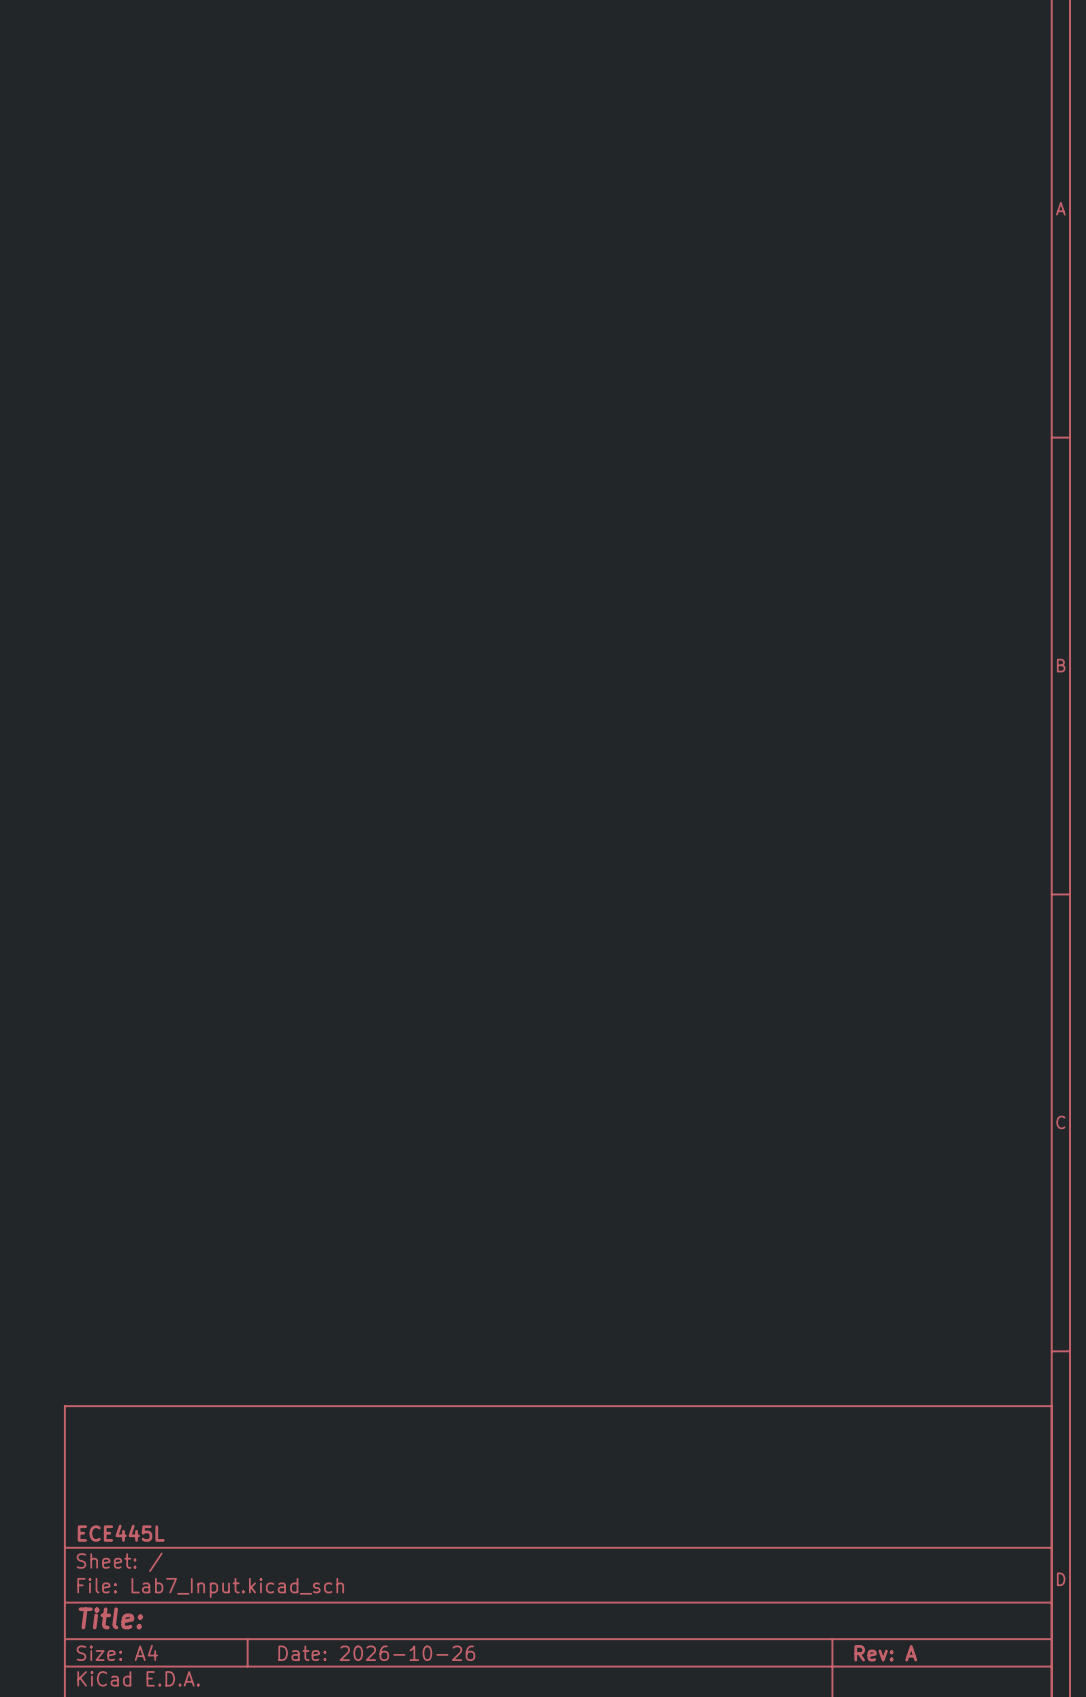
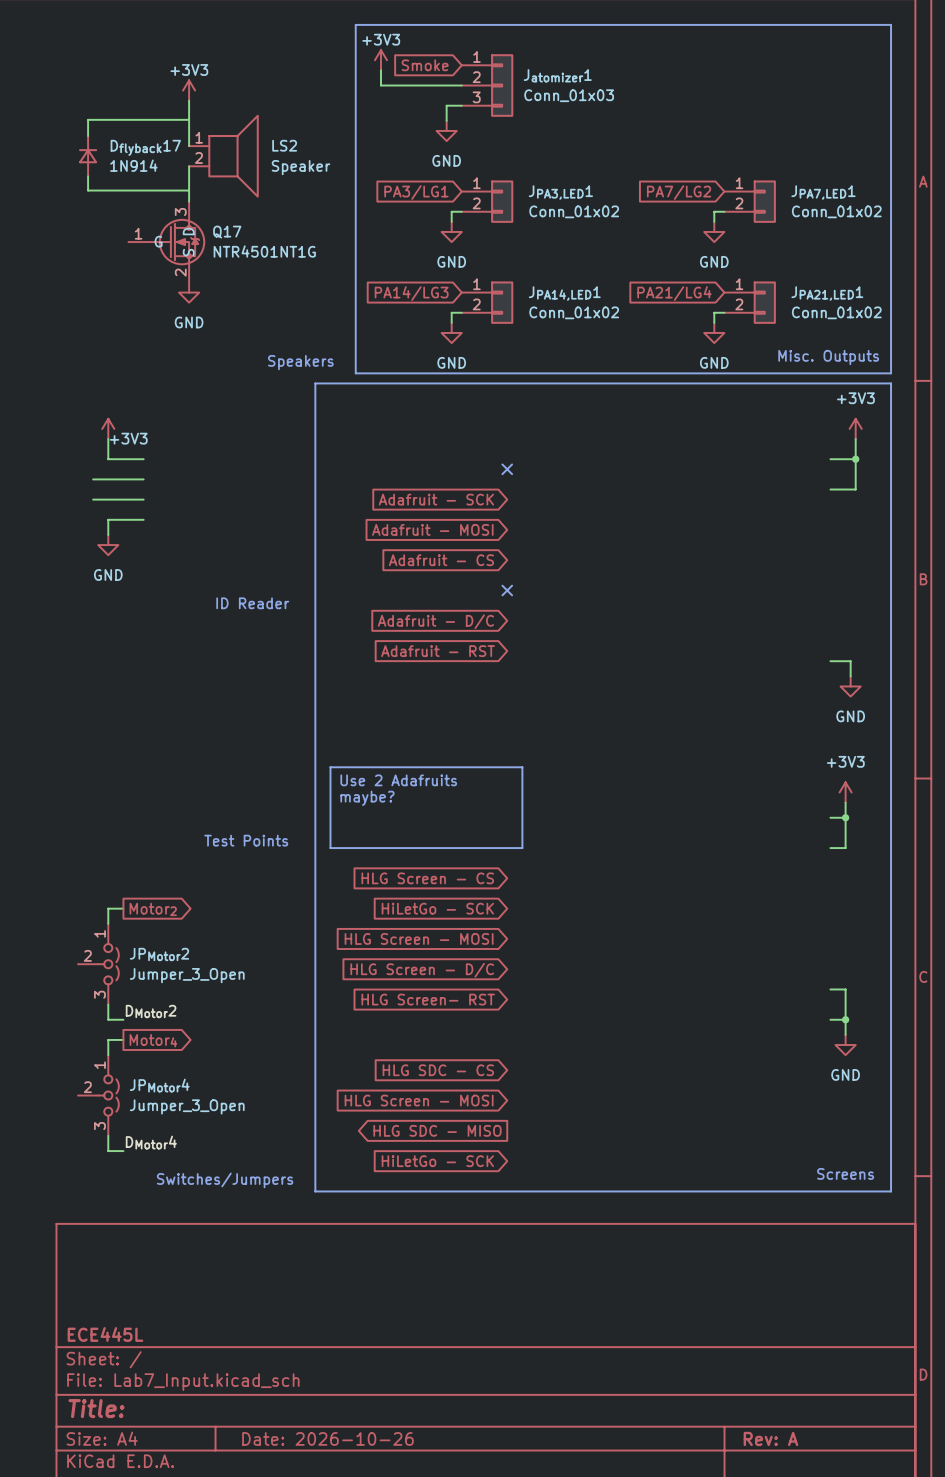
line: none -> (355, 24) (891, 24) (891, 373) (355, 373) (355, 24)
power symbol: none -> +3V3 (380, 60)
global label: none -> Smoke (425, 65)
wire: none -> (380, 70) (380, 85) (461, 85)
Jatomizer1: none -> Conn_01x03 (487, 85)
power symbol: none -> +3V3 (189, 90)
wire: none -> (189, 100) (189, 146)
wire: none -> (461, 105) (446, 105) (446, 120)
wire: none -> (189, 119) (88, 119) (88, 136)
power symbol: none -> GND (446, 130)
Dflyback17: none -> 1N914 (88, 156)
LS2: none -> Speaker (223, 156)
wire: none -> (189, 166) (189, 201)
wire: none -> (88, 176) (88, 190) (189, 190)
global label: none -> PA3/LG1 (416, 192)
global label: none -> PA7/LG2 (679, 192)
JPA3,LED1: none -> Conn_01x02 (487, 201)
JPA7,LED1: none -> Conn_01x02 (750, 201)
wire: none -> (461, 211) (451, 211) (451, 221)
wire: none -> (724, 211) (714, 211) (714, 221)
power symbol: none -> GND (451, 231)
power symbol: none -> GND (714, 231)
Q17: none -> NTR4501NT1G (166, 242)
power symbol: none -> GND (189, 292)
global label: none -> PA14/LG3 (411, 293)
global label: none -> PA21/LG4 (674, 293)
JPA14,LED1: none -> Conn_01x02 (487, 302)
JPA21,LED1: none -> Conn_01x02 (750, 302)
wire: none -> (461, 312) (451, 312) (451, 322)
wire: none -> (724, 312) (714, 312) (714, 322)
power symbol: none -> GND (451, 332)
power symbol: none -> GND (714, 332)
text: none -> Misc. Outputs (828, 357)
text: none -> Speakers (300, 362)
line: none -> (315, 383) (891, 383) (891, 1191) (315, 1191) (315, 383)
power symbol: none -> +3V3 (108, 428)
power symbol: none -> +3V3 (855, 428)
wire: none -> (108, 439) (108, 459) (143, 459)
wire: none -> (855, 439) (855, 489) (830, 489)
wire: none -> (830, 459) (855, 459)
junction: none -> (855, 459)
no-connect mark: none -> (507, 469)
wire: none -> (93, 479) (143, 479)
wire: none -> (93, 499) (143, 499)
global label: none -> Adafruit - SCK (436, 499)
wire: none -> (143, 519) (108, 519) (108, 534)
global label: none -> Adafruit - MOSI (432, 529)
power symbol: none -> GND (108, 545)
global label: none -> Adafruit - CS (441, 560)
no-connect mark: none -> (507, 590)
text: none -> ID Reader (252, 603)
global label: none -> Adafruit - D/C (435, 621)
global label: none -> Adafruit - RST (438, 651)
wire: none -> (830, 661) (850, 661) (850, 676)
power symbol: none -> GND (850, 686)
line: none -> (330, 767) (522, 767) (522, 848) (330, 848) (330, 767)
text: none -> Use 2 Adafruits (398, 780)
power symbol: none -> +3V3 (845, 792)
text: none -> maybe? (367, 798)
wire: none -> (845, 802) (845, 848) (830, 848)
wire: none -> (830, 817) (845, 817)
junction: none -> (845, 817)
text: none -> Test Points (246, 840)
global label: none -> HLG Screen - CS (427, 878)
wire: none -> (123, 908) (108, 908) (108, 923)
global label: none -> Motor2 (153, 909)
global label: none -> HiLetGo - SCK (437, 908)
global label: none -> HLG Screen - MOSI (419, 938)
JPMotor2: none -> Jumper_3_Open (98, 964)
global label: none -> HLG Screen - D/C (422, 970)
wire: none -> (830, 989) (845, 989) (845, 1034)
global label: none -> HLG Screen- RST (428, 999)
wire: none -> (108, 1004) (108, 1019) (123, 1019)
label: none -> DMotor2 (151, 1011)
wire: none -> (830, 1019) (845, 1019)
junction: none -> (845, 1019)
wire: none -> (123, 1039) (108, 1039) (108, 1055)
global label: none -> Motor4 (153, 1040)
power symbol: none -> GND (845, 1045)
global label: none -> HLG SDC - CS (438, 1070)
JPMotor4: none -> Jumper_3_Open (98, 1095)
global label: none -> HLG Screen - MOSI (419, 1100)
global label: none -> HLG SDC - MISO (437, 1130)
wire: none -> (108, 1135) (108, 1151) (123, 1151)
label: none -> DMotor4 (151, 1142)
global label: none -> HiLetGo - SCK (437, 1161)
text: none -> Screens (845, 1173)
text: none -> Switches/Jumpers (225, 1180)

